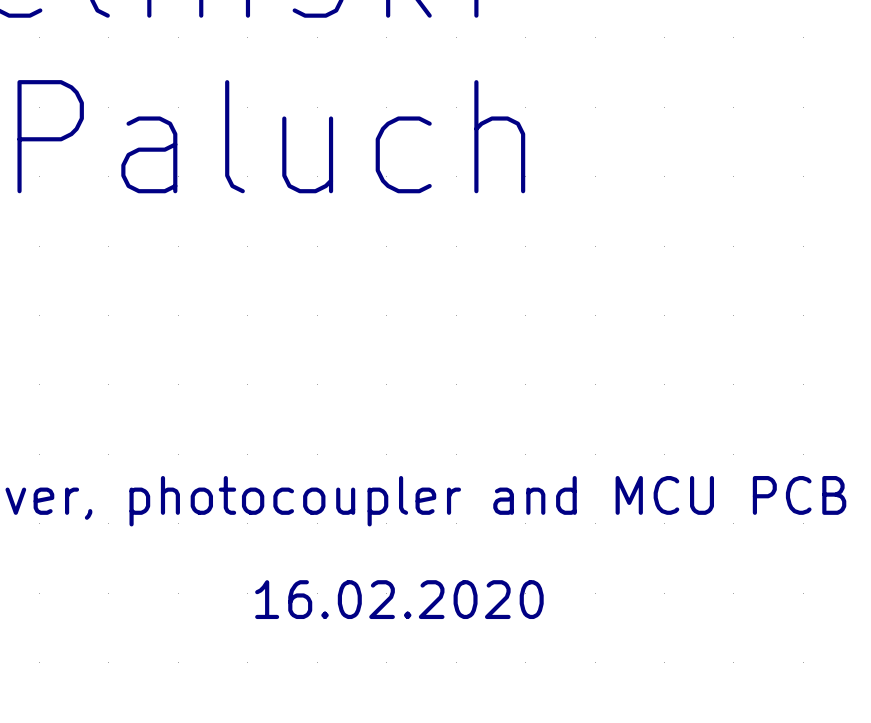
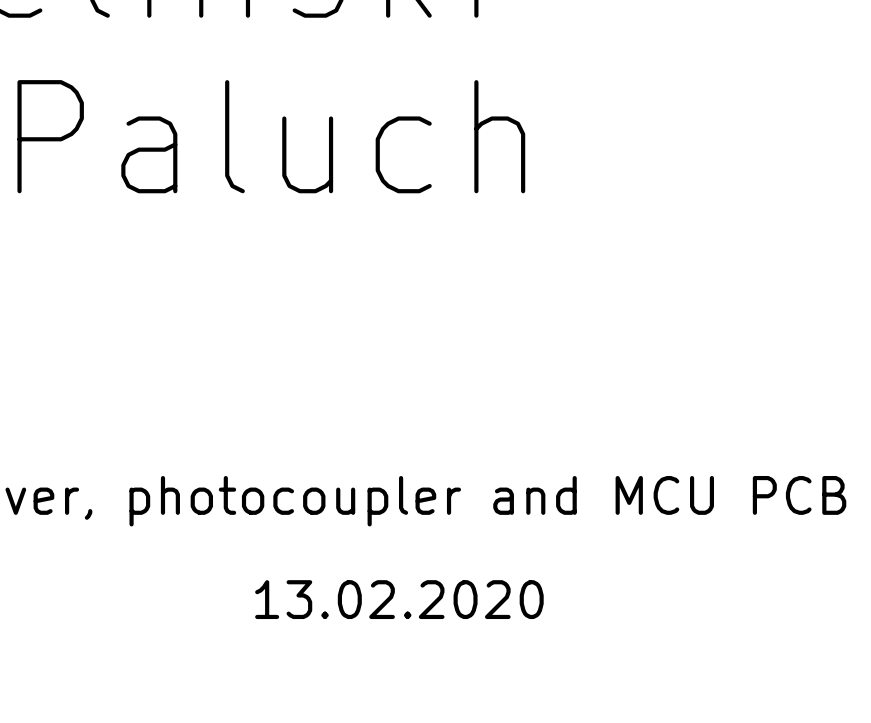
text: 16.02.2020 (399, 599) -> 13.02.2020 (399, 599)

